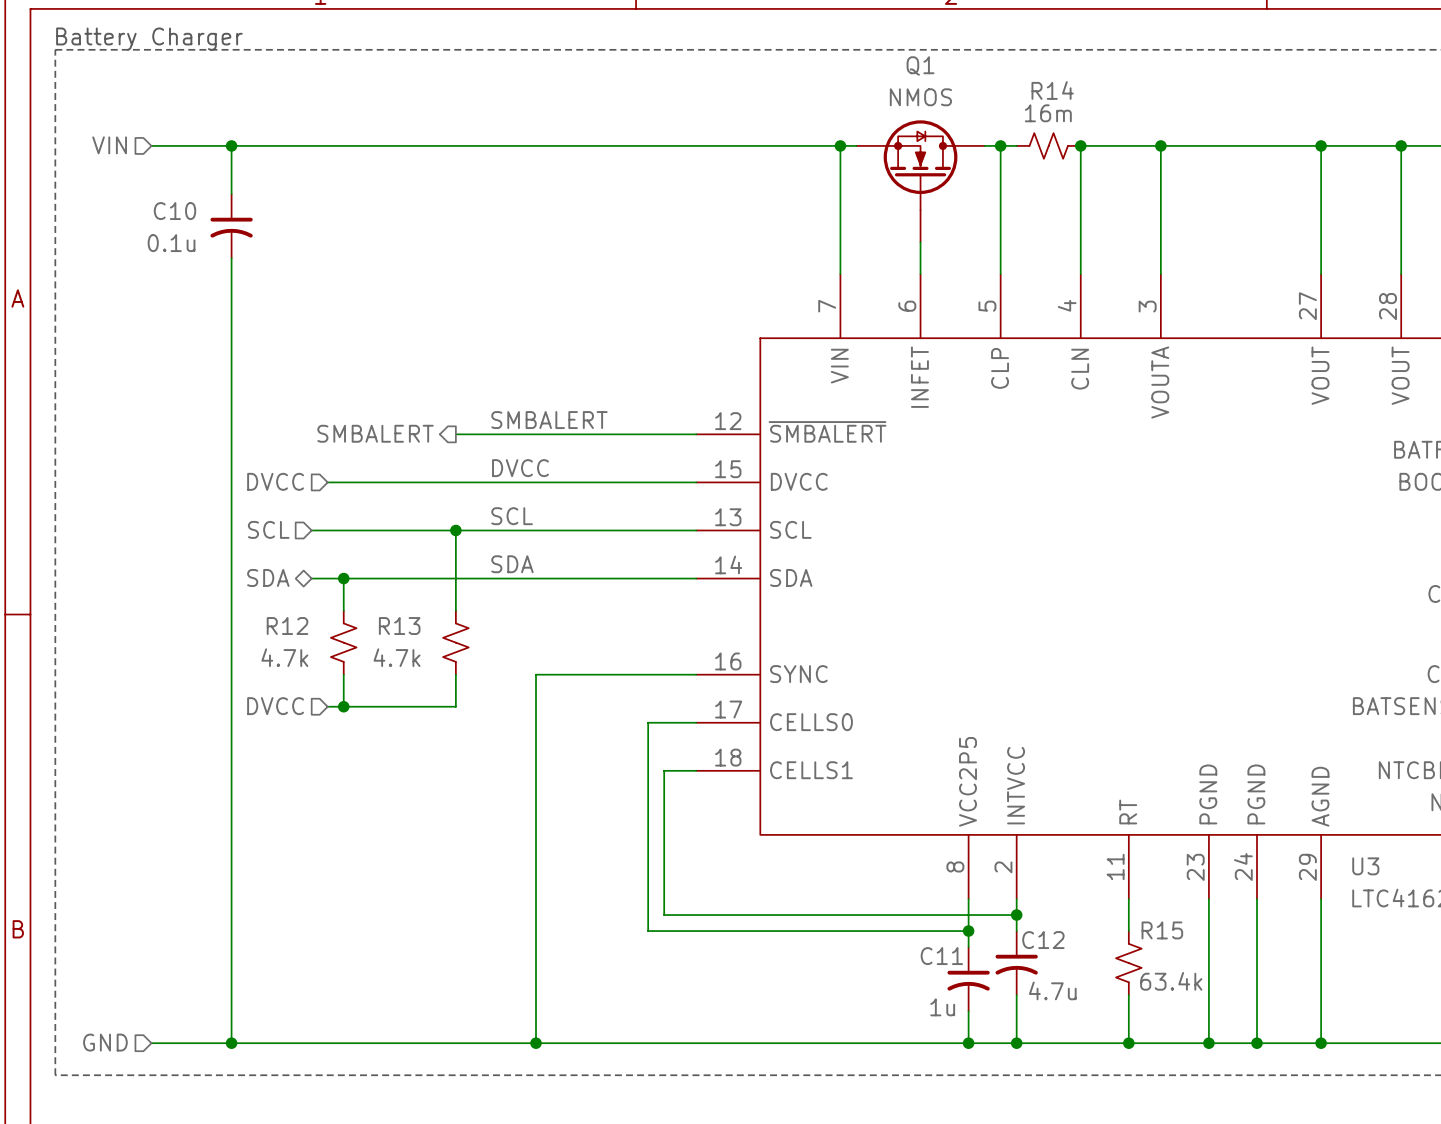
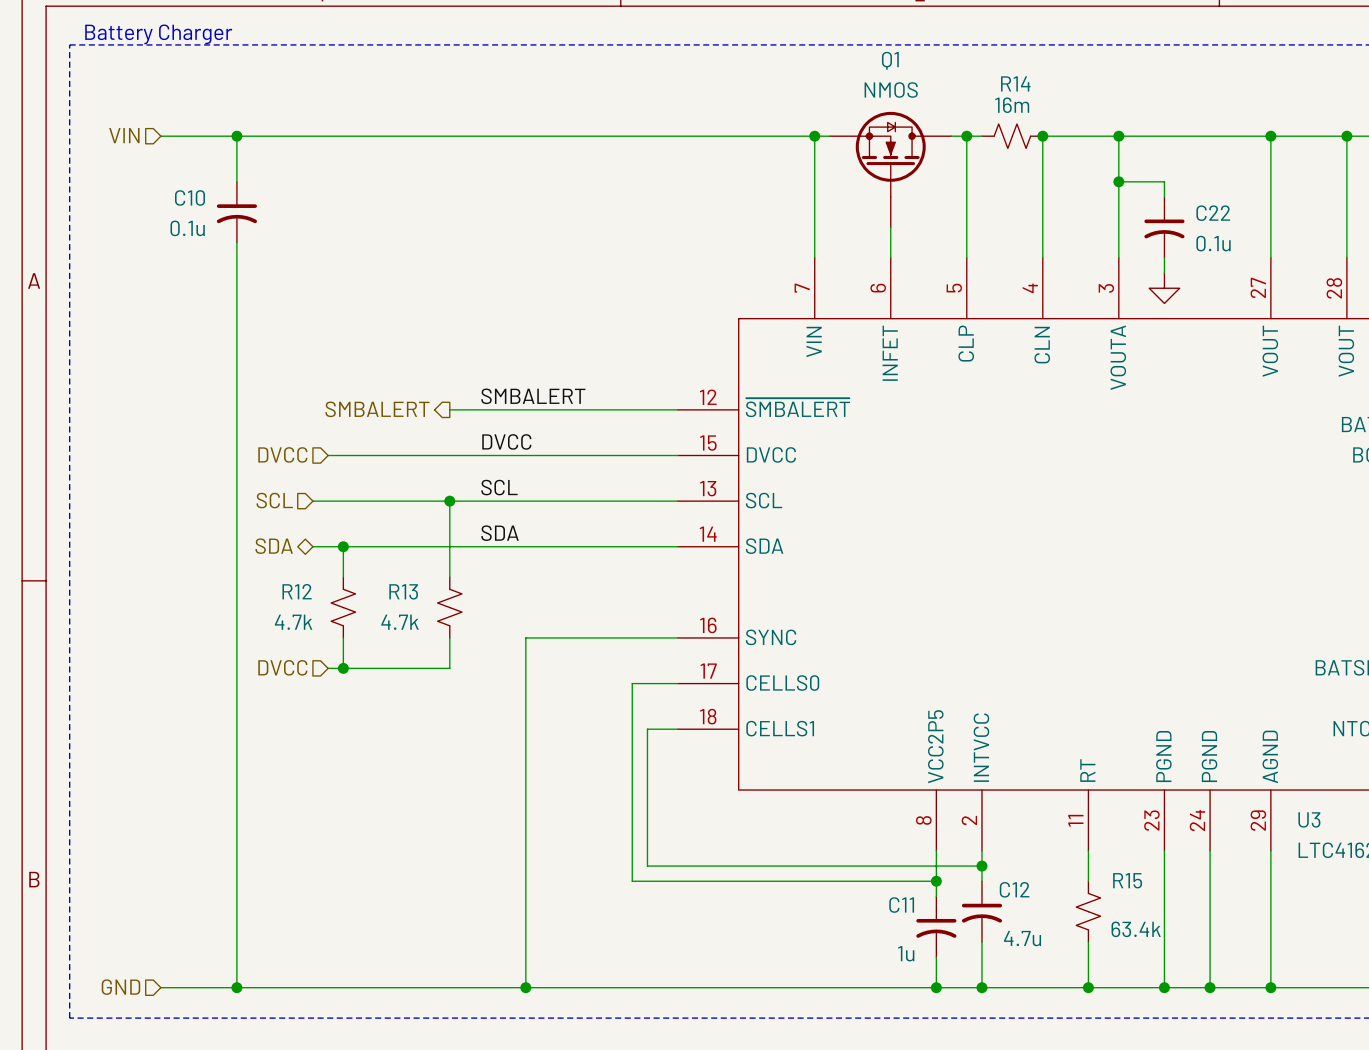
wire: none -> (1118, 181) (1164, 181) (1164, 197)
junction: none -> (1118, 181)
C22: none -> 0.1u (1164, 227)
wire: none -> (1164, 257) (1164, 273)
power symbol: none -> (1164, 288)

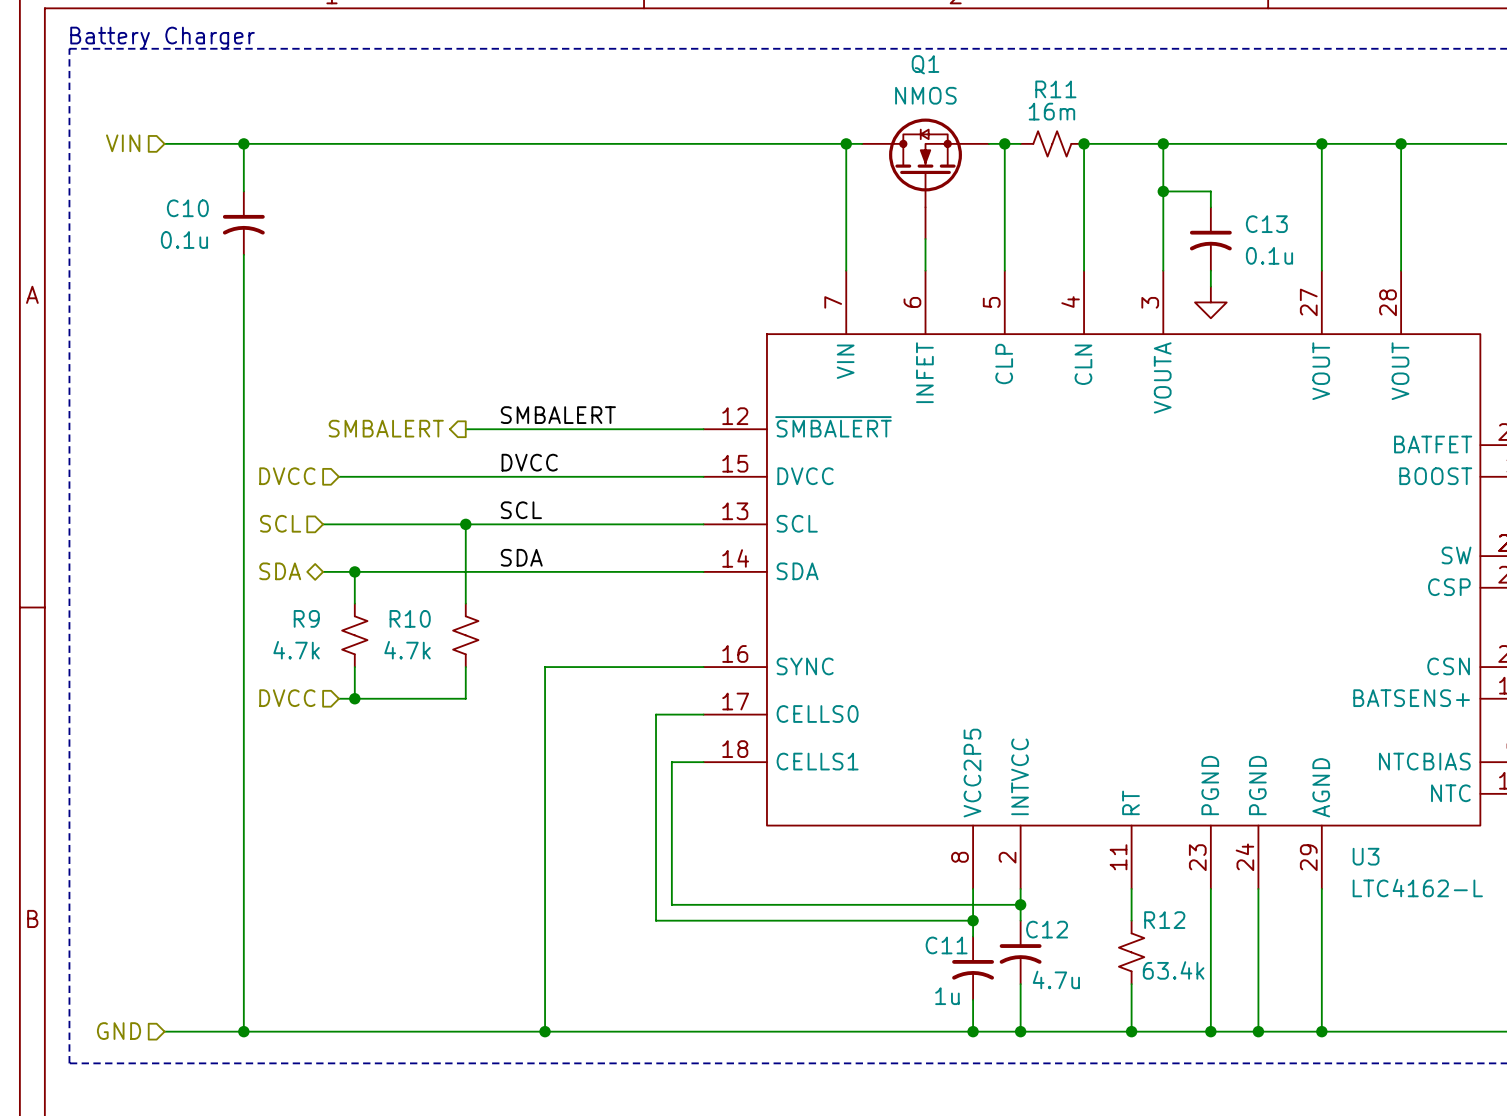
R14 name: R14 (1015, 83) -> R11 (1055, 89)
Q1 flip: as is (890, 154) -> left-right (925, 162)
C22 name: C22 (1213, 213) -> C13 (1266, 224)
R12 name: R12 (297, 591) -> R9 (306, 618)
R13 name: R13 (403, 591) -> R10 (410, 618)
R15 name: R15 (1127, 880) -> R12 (1164, 920)

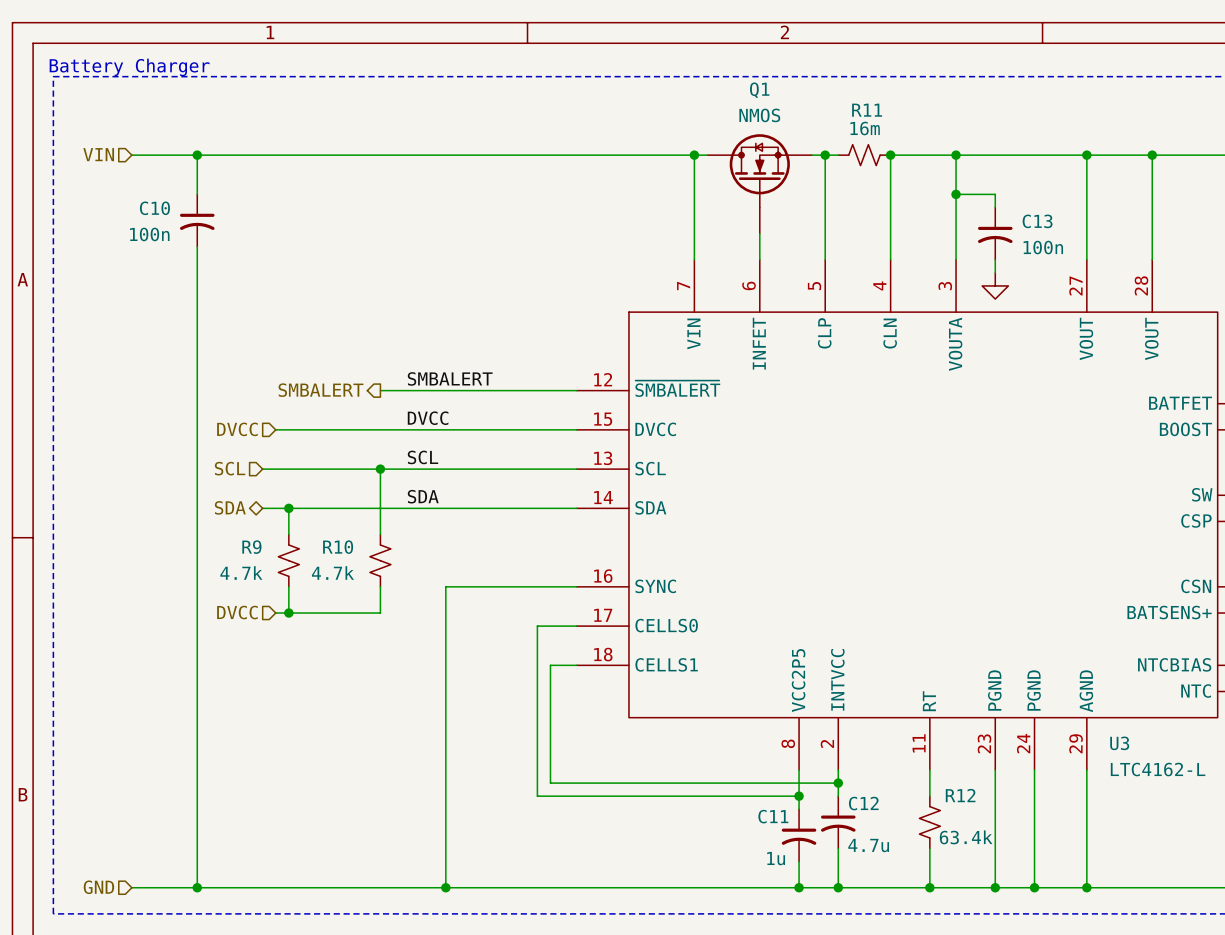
C10 value: 0.1u (184, 240) -> 100n (149, 234)
C13 value: 0.1u (1269, 255) -> 100n (1043, 247)

